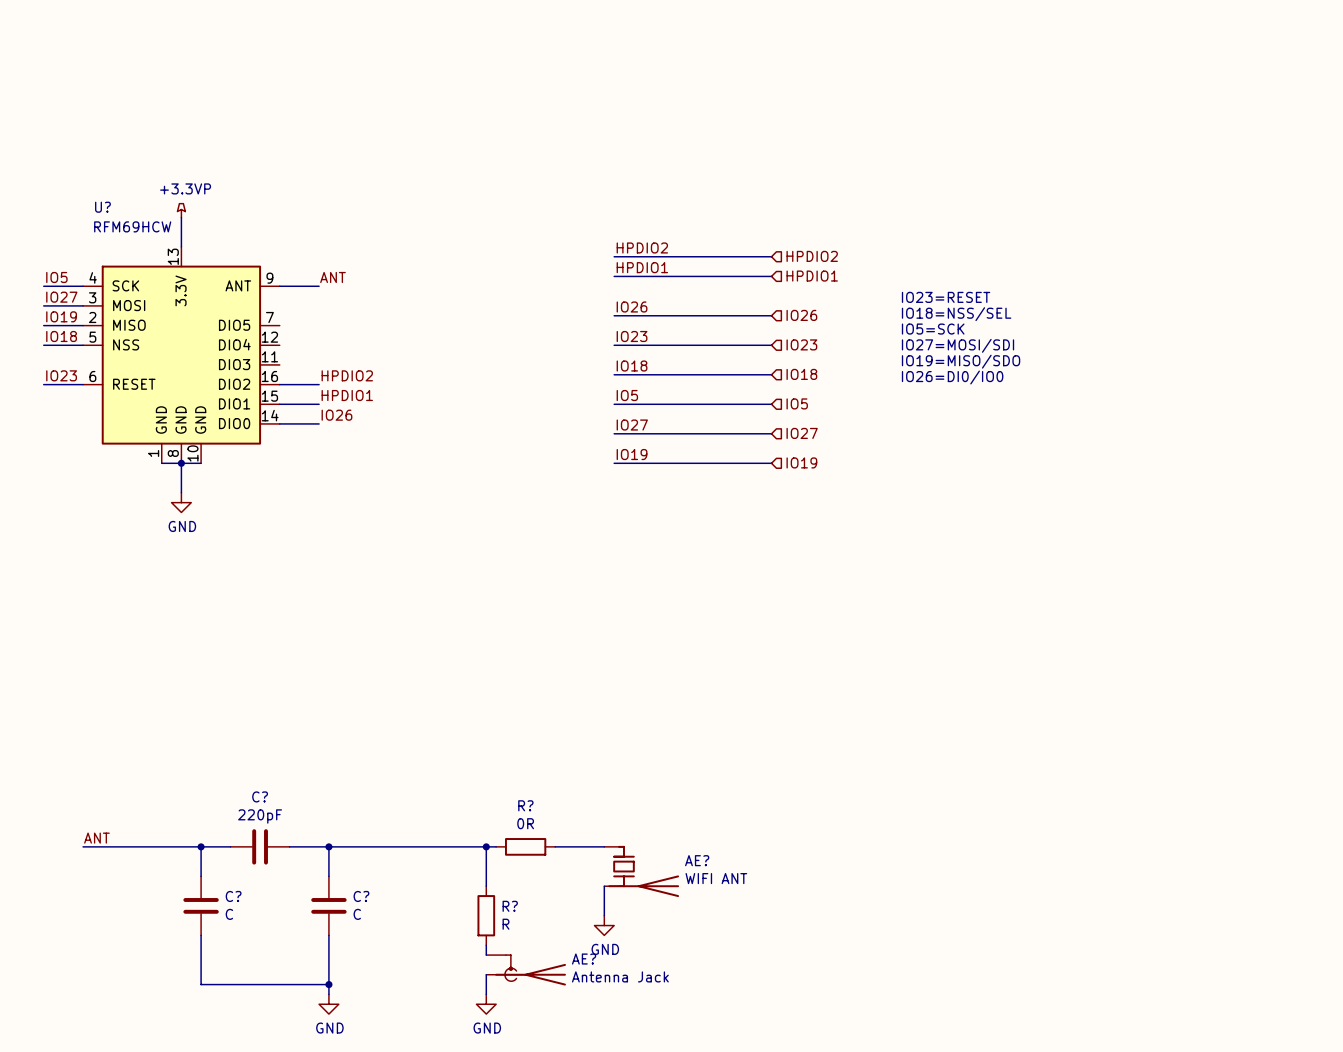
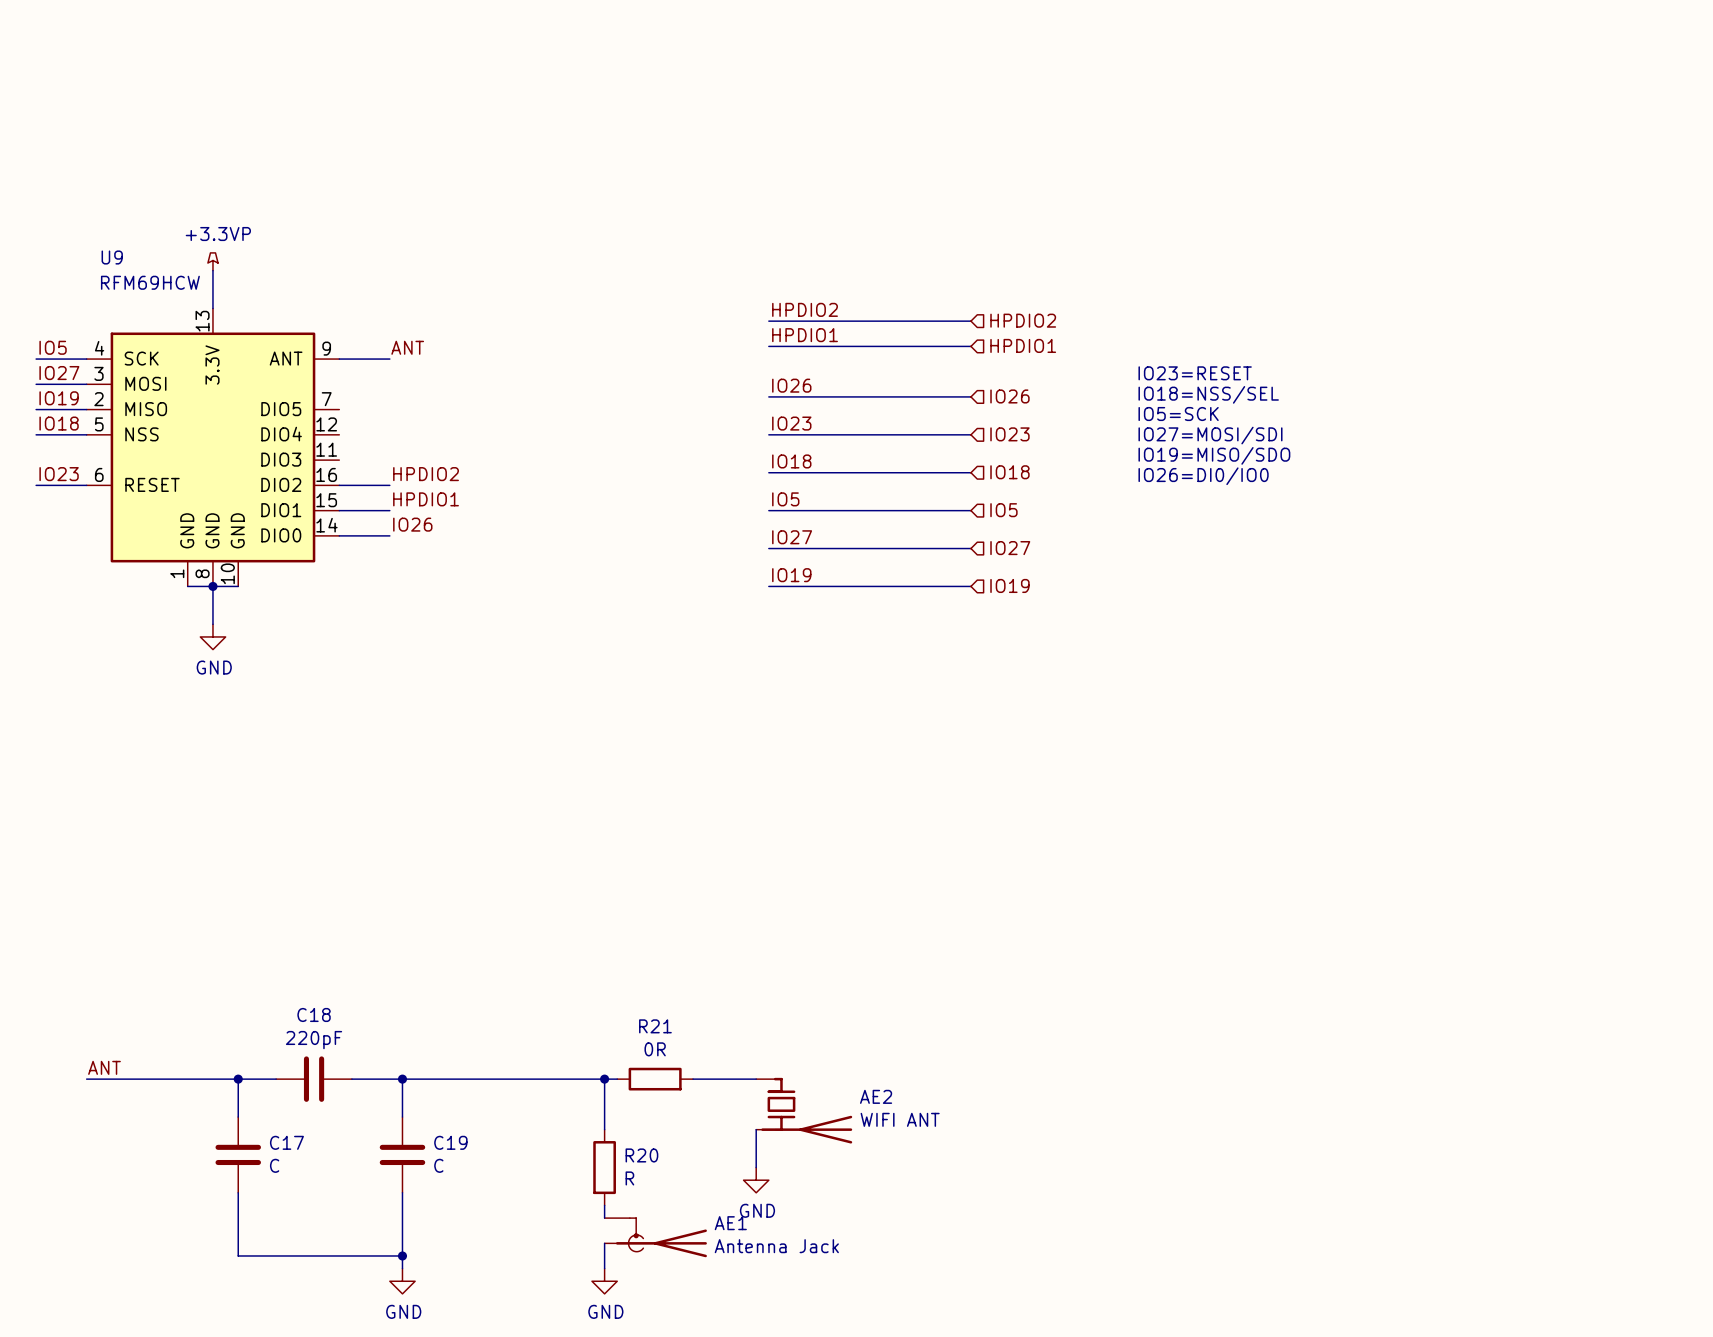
U? name: U? (102, 207) -> U9 (112, 257)
C? name: C? (260, 796) -> C18 (314, 1014)
R? name: R? (525, 805) -> R21 (655, 1026)
AE? name: AE? (697, 860) -> AE2 (876, 1096)
C? name: C? (233, 896) -> C17 (286, 1142)
C? name: C? (361, 896) -> C19 (450, 1142)
R? name: R? (510, 906) -> R20 (641, 1155)
AE? name: AE? (584, 959) -> AE1 (730, 1223)

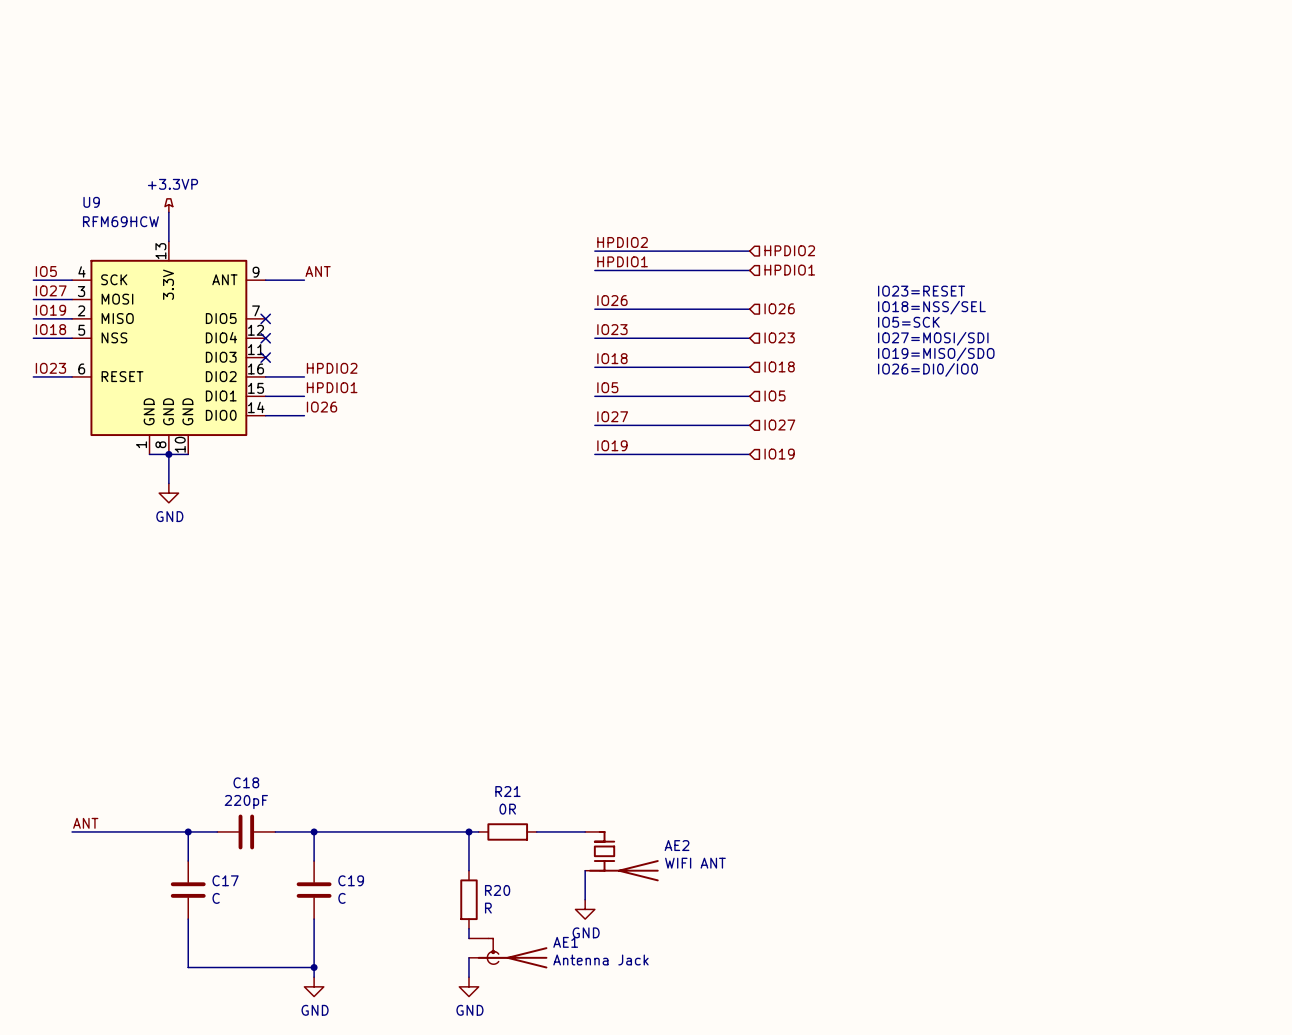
no-connect mark: none -> (265, 318)
no-connect mark: none -> (265, 338)
no-connect mark: none -> (265, 357)

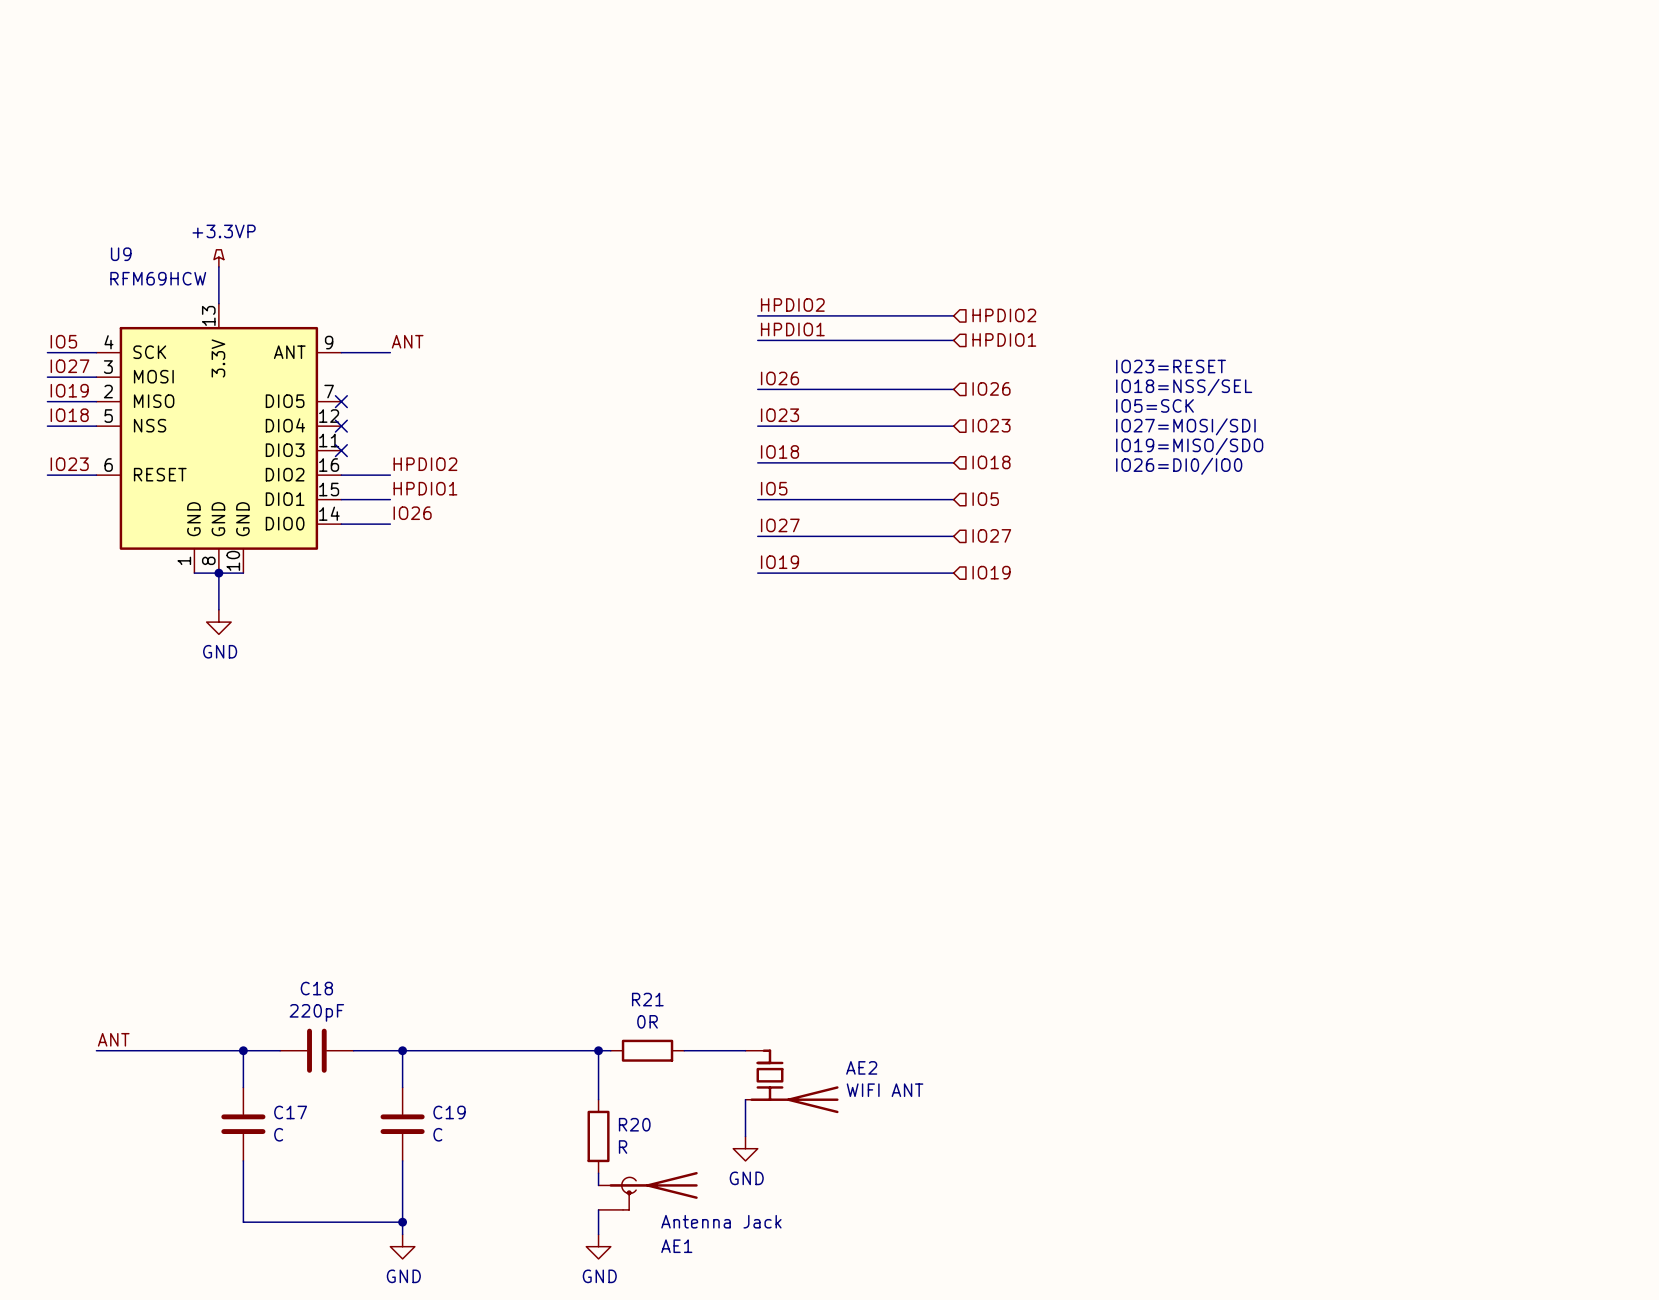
AE1 name position: AE1 (565, 942) -> AE1 (676, 1246)
AE1 flip: as is (512, 953) -> up-down (653, 1190)
AE1 value position: Antenna Jack (600, 959) -> Antenna Jack (721, 1221)

